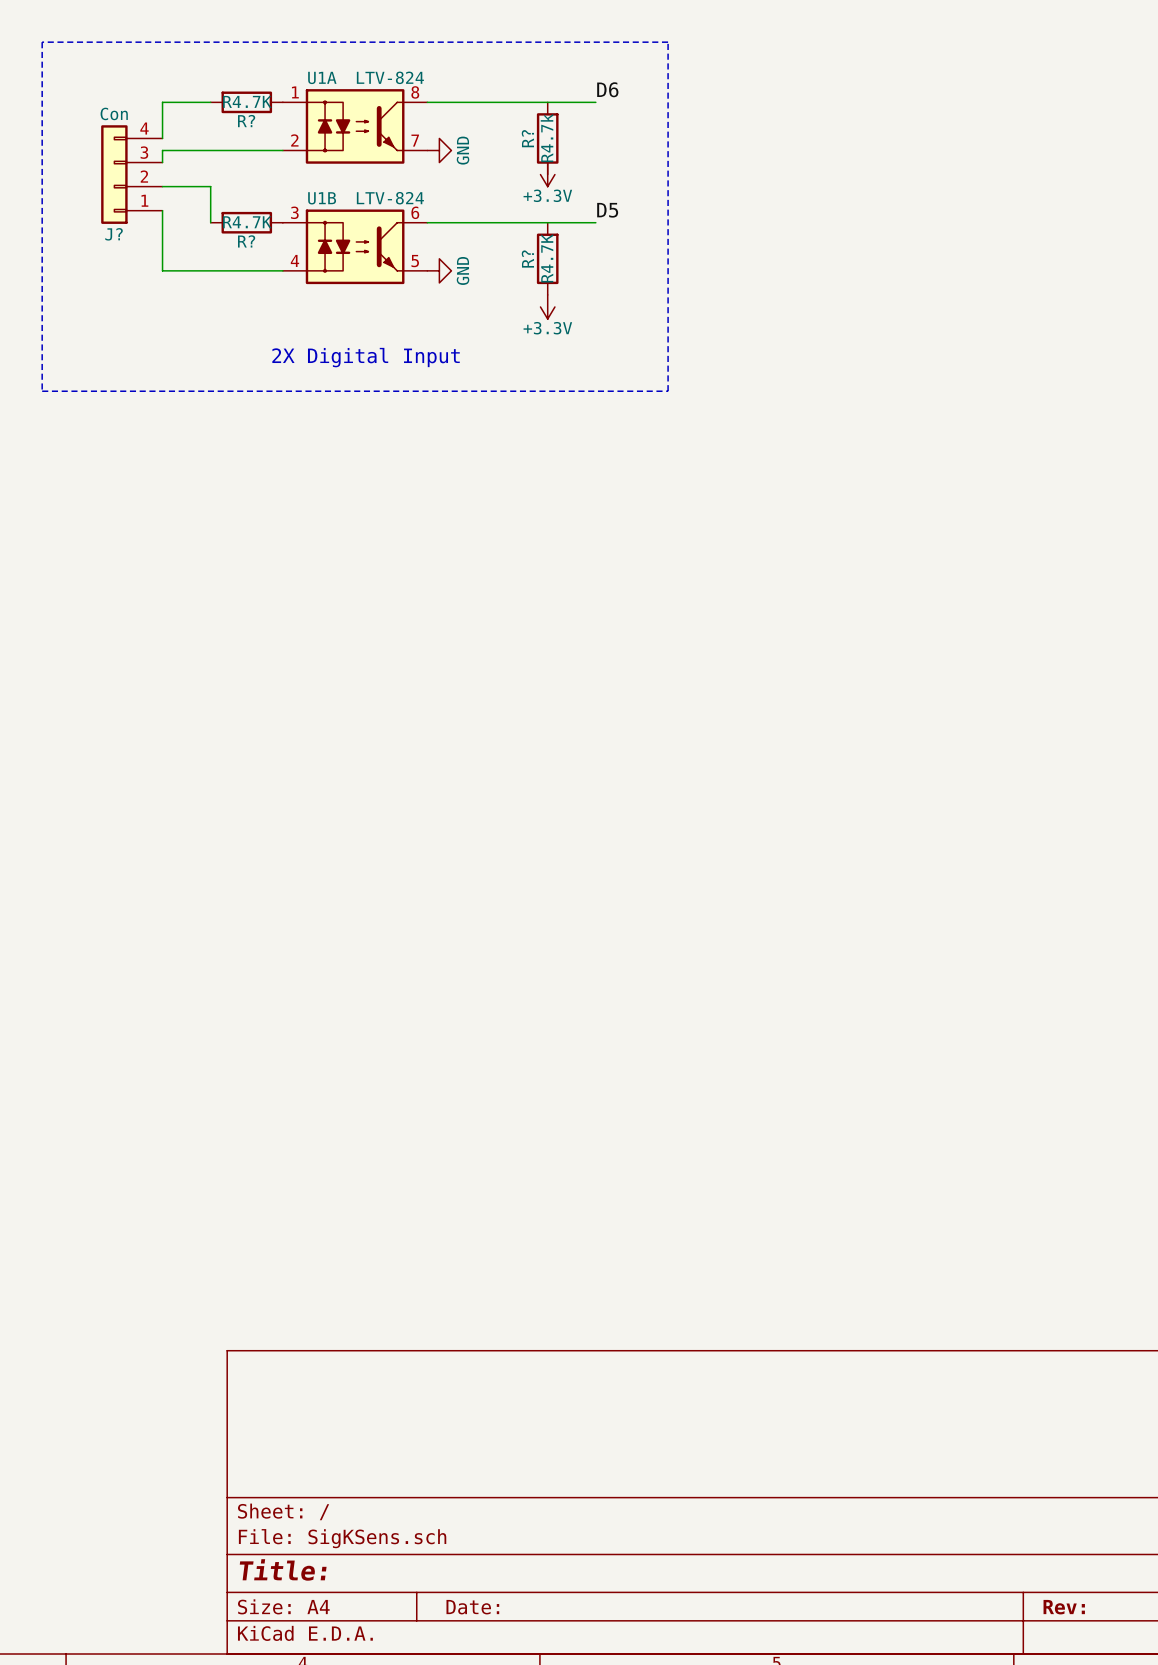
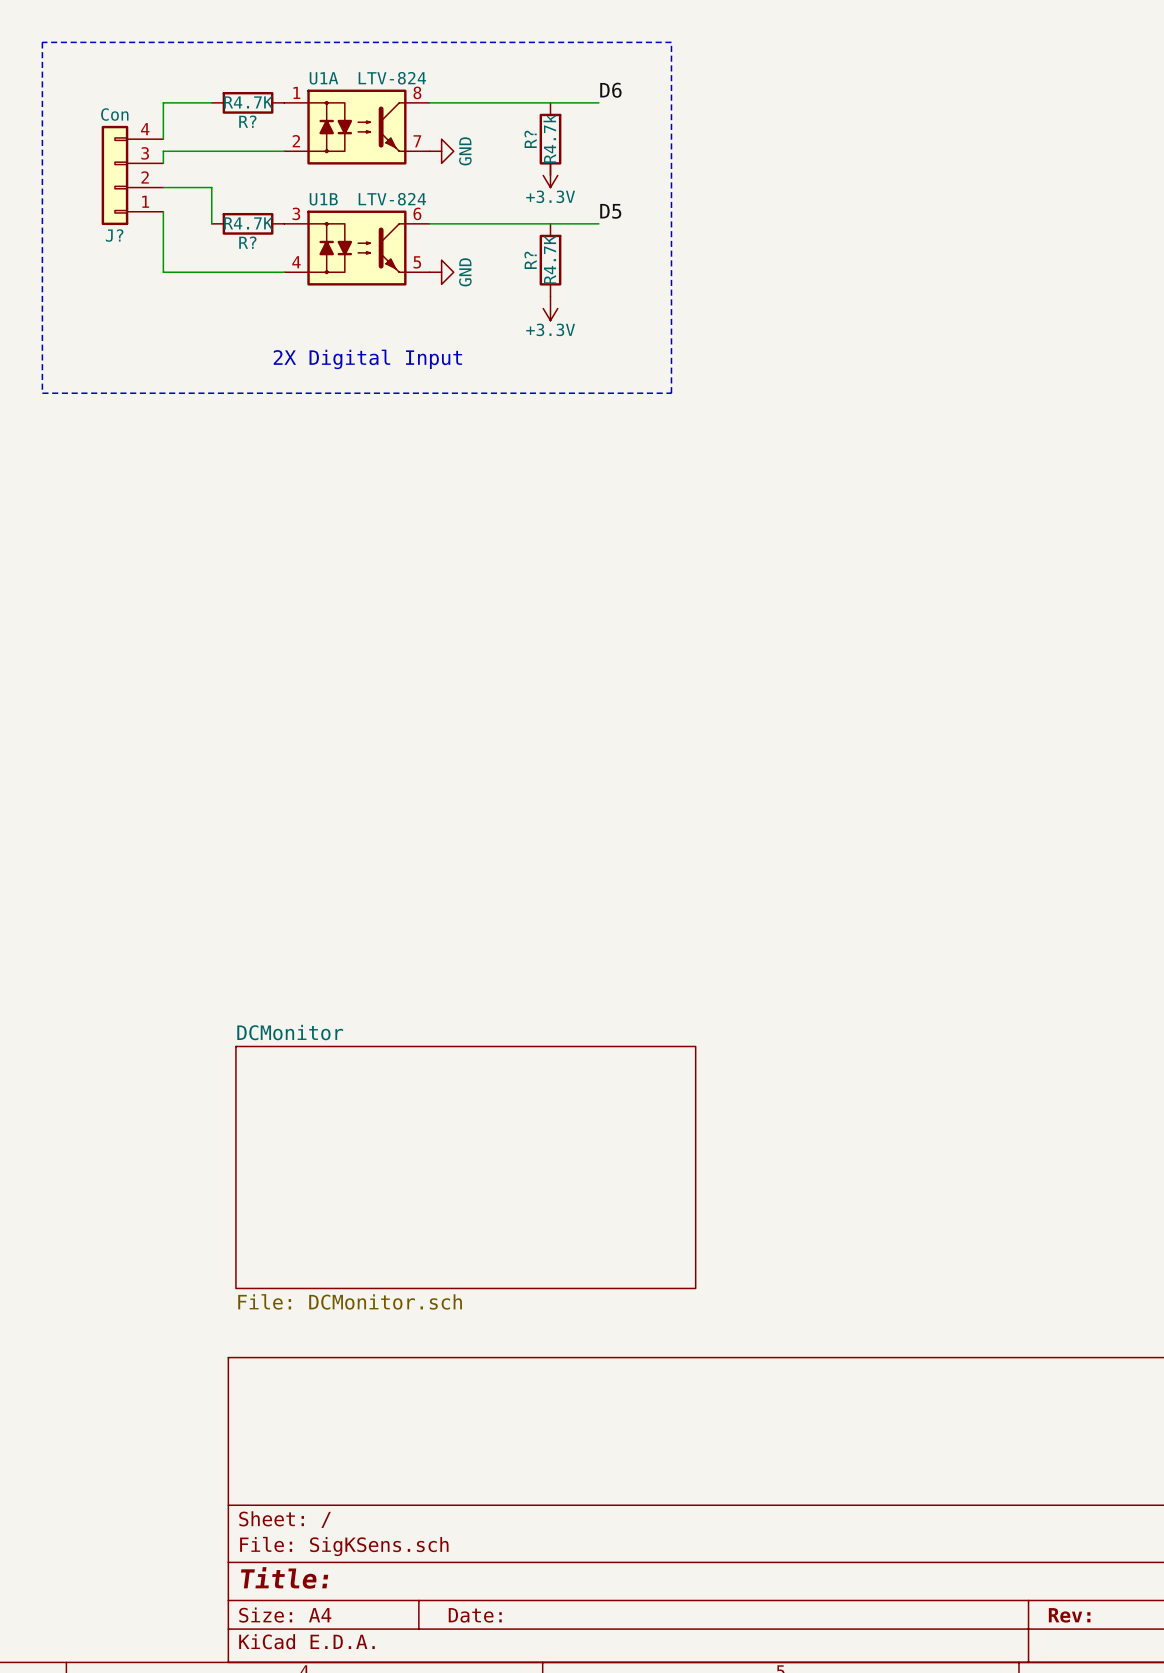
sheet DCMonitor: none -> File: DCMonitor.sch (465, 1167)

